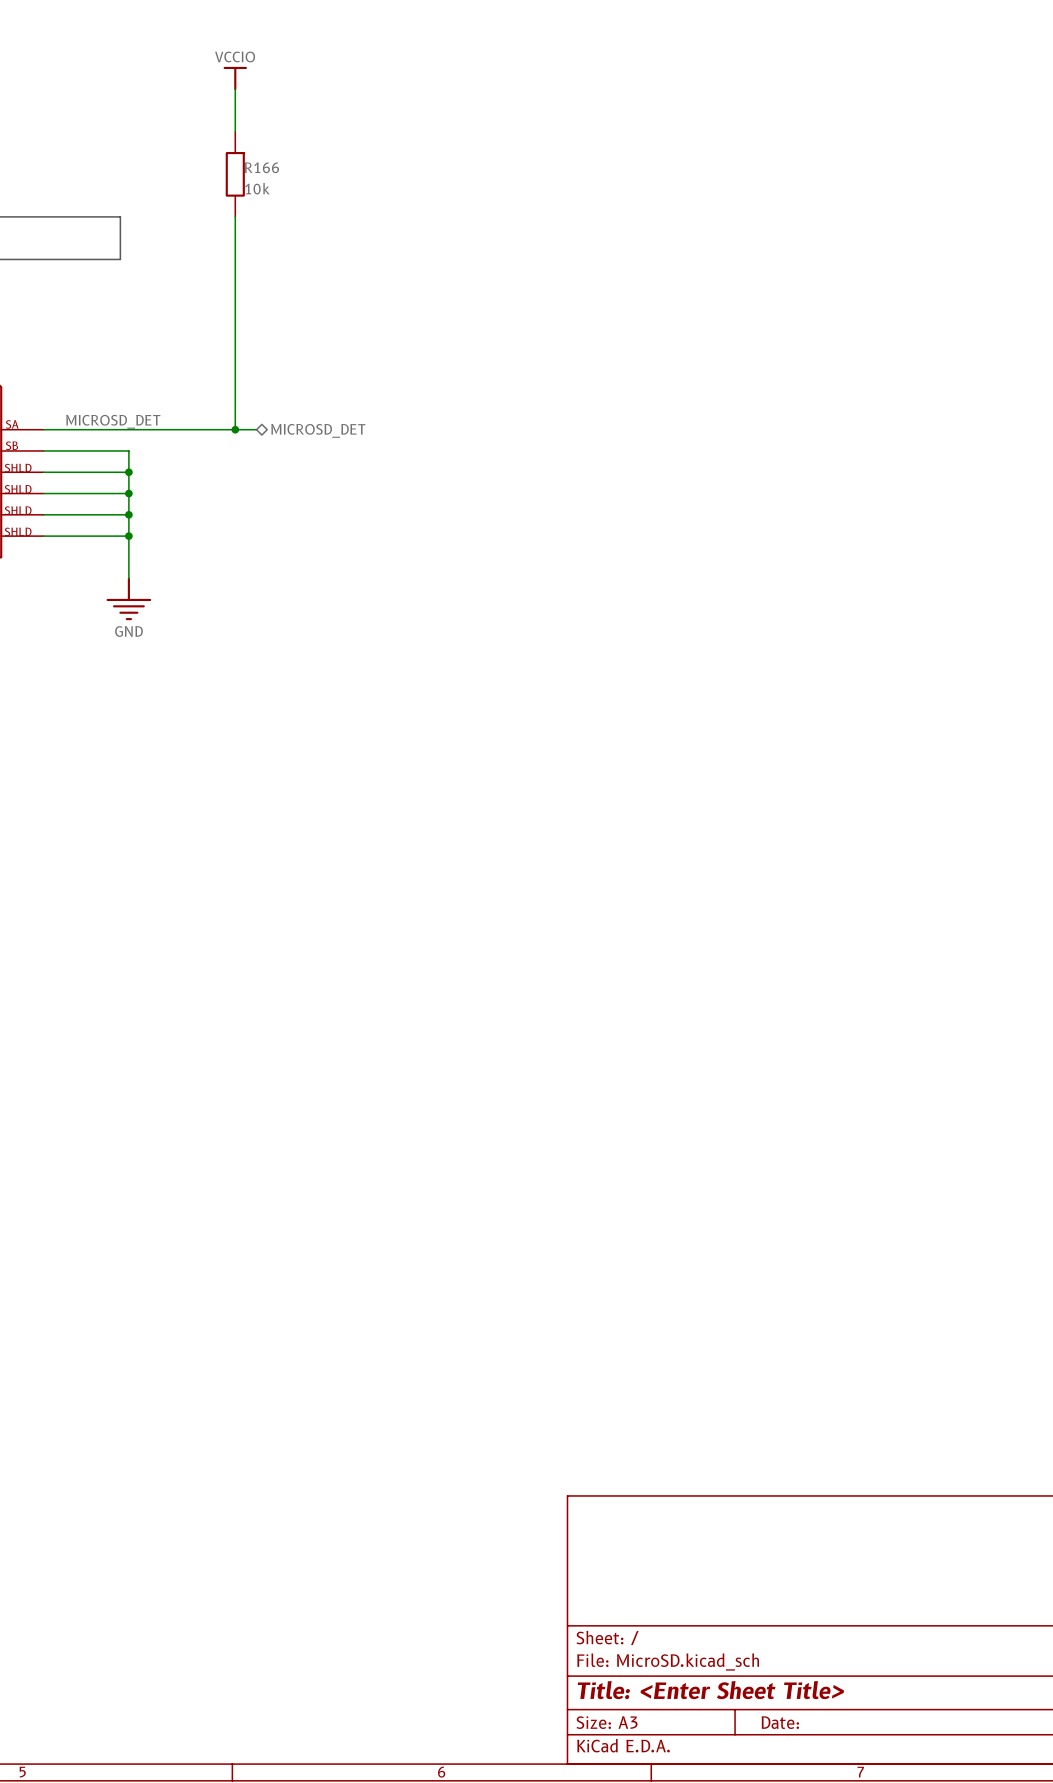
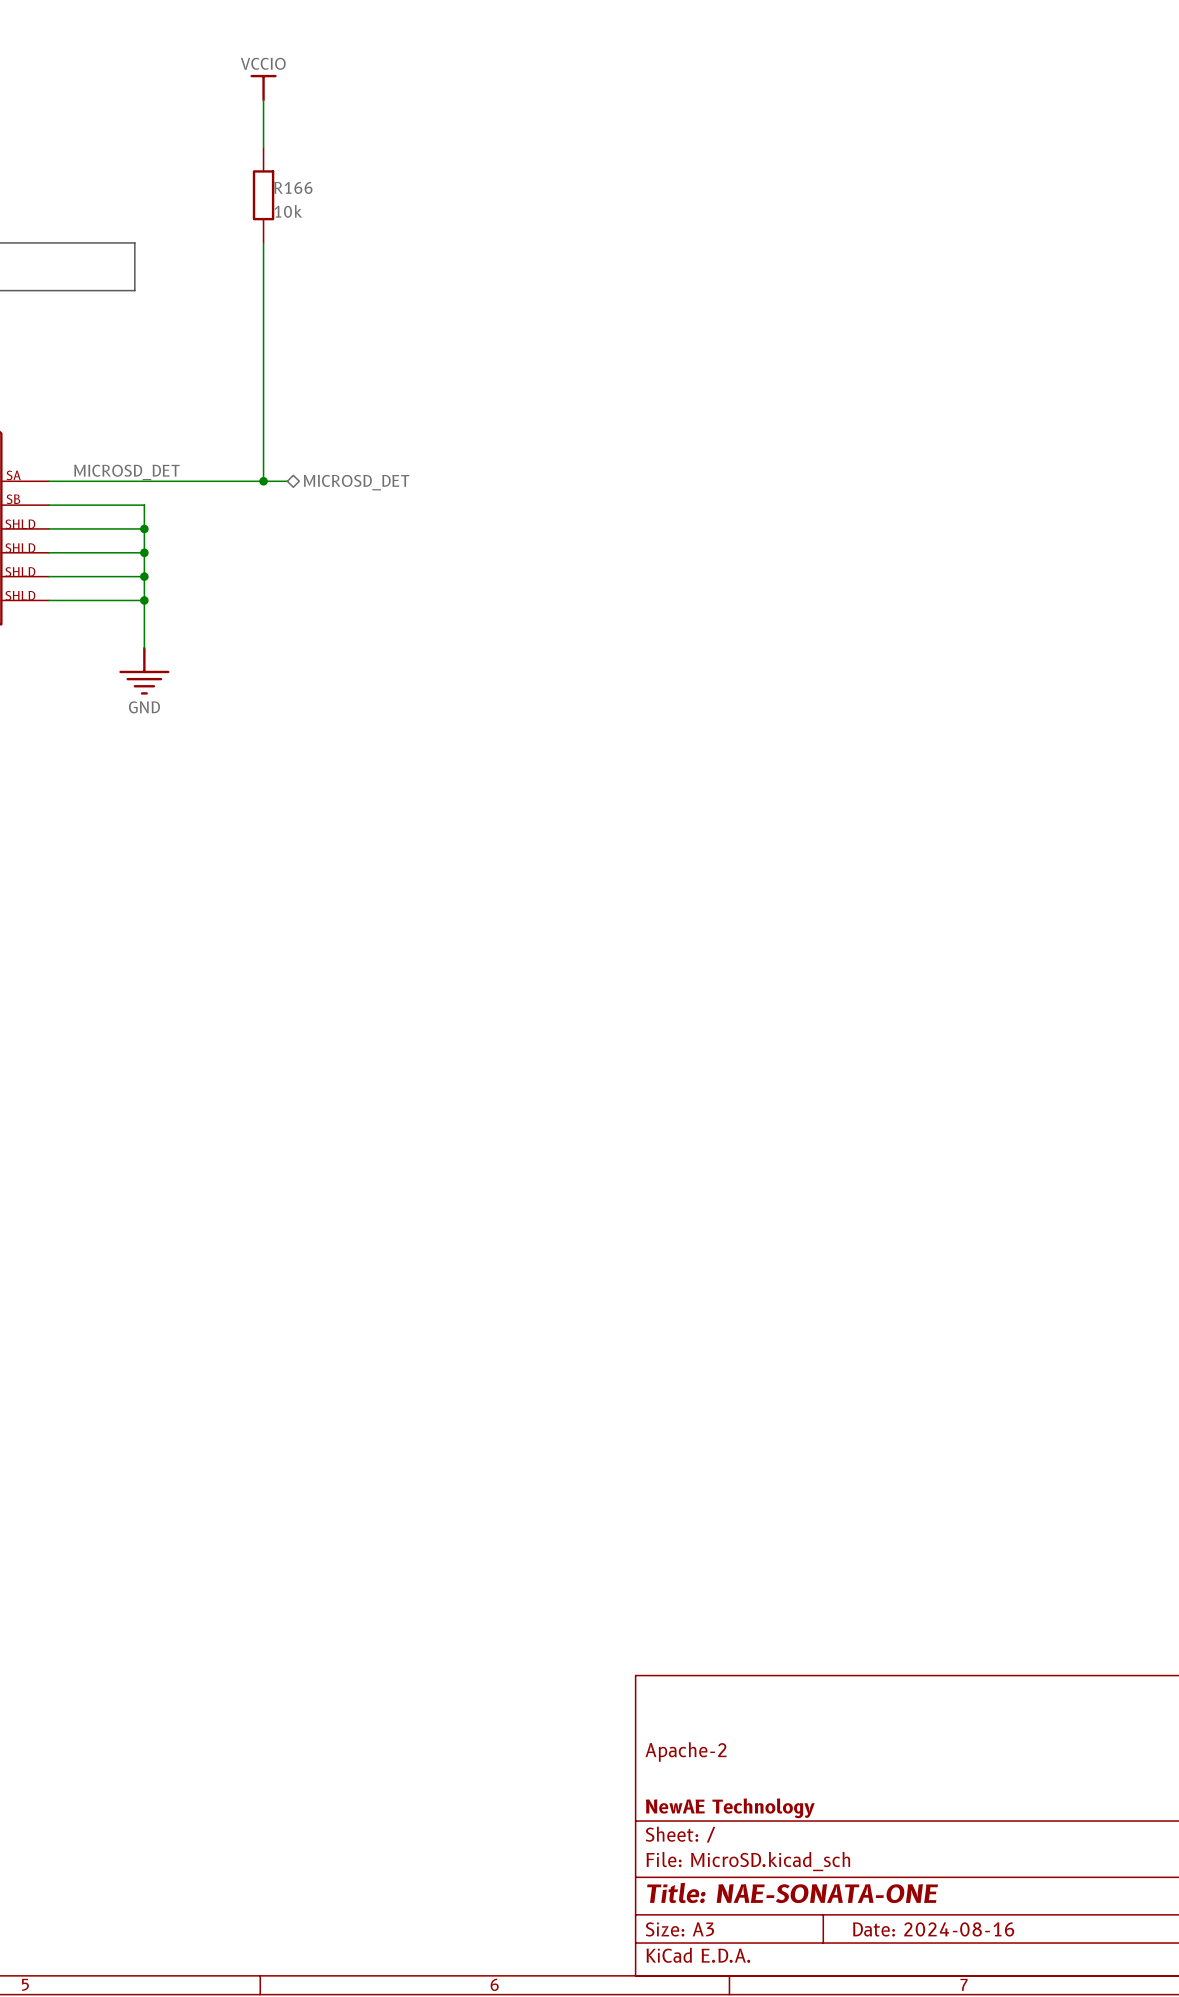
title block: none -> Apache-2 (686, 1751)
title block: none -> NewAE Technology (730, 1808)
title block: Title: <Enter Sheet Title> (710, 1690) -> Title: NAE-SONATA-ONE (792, 1892)
title block: Date: (780, 1722) -> Date: 2024-08-16 (933, 1929)

